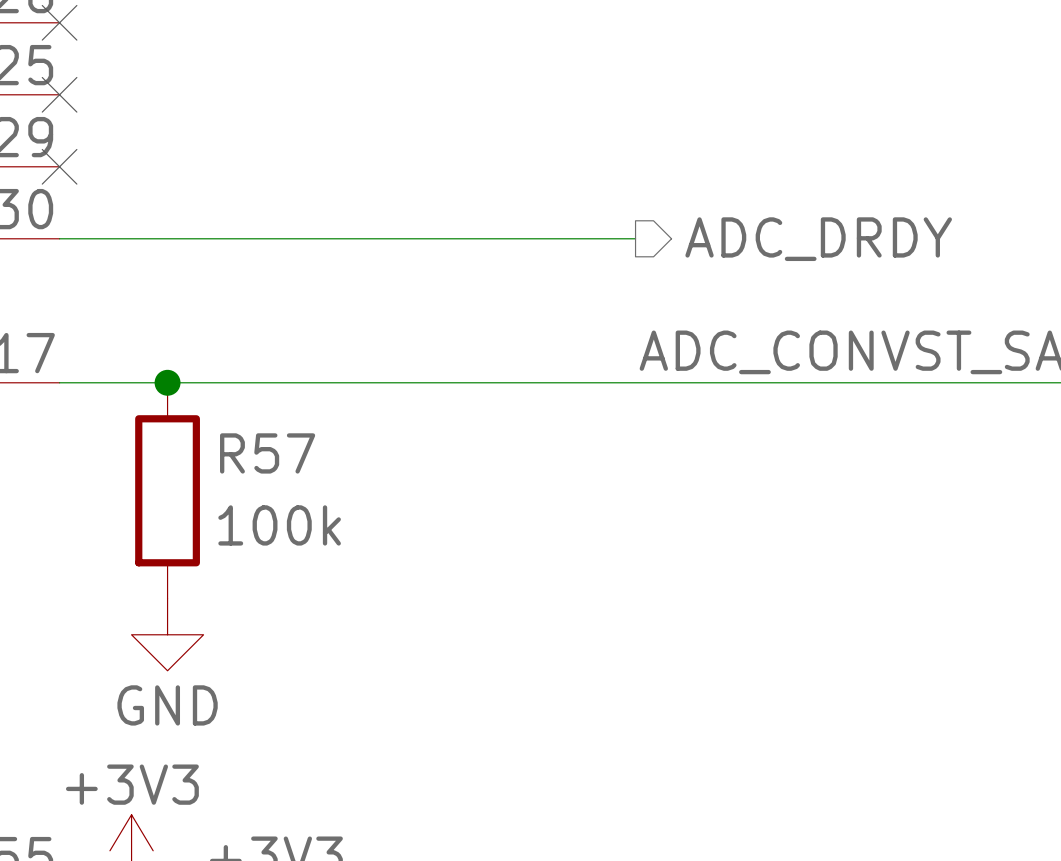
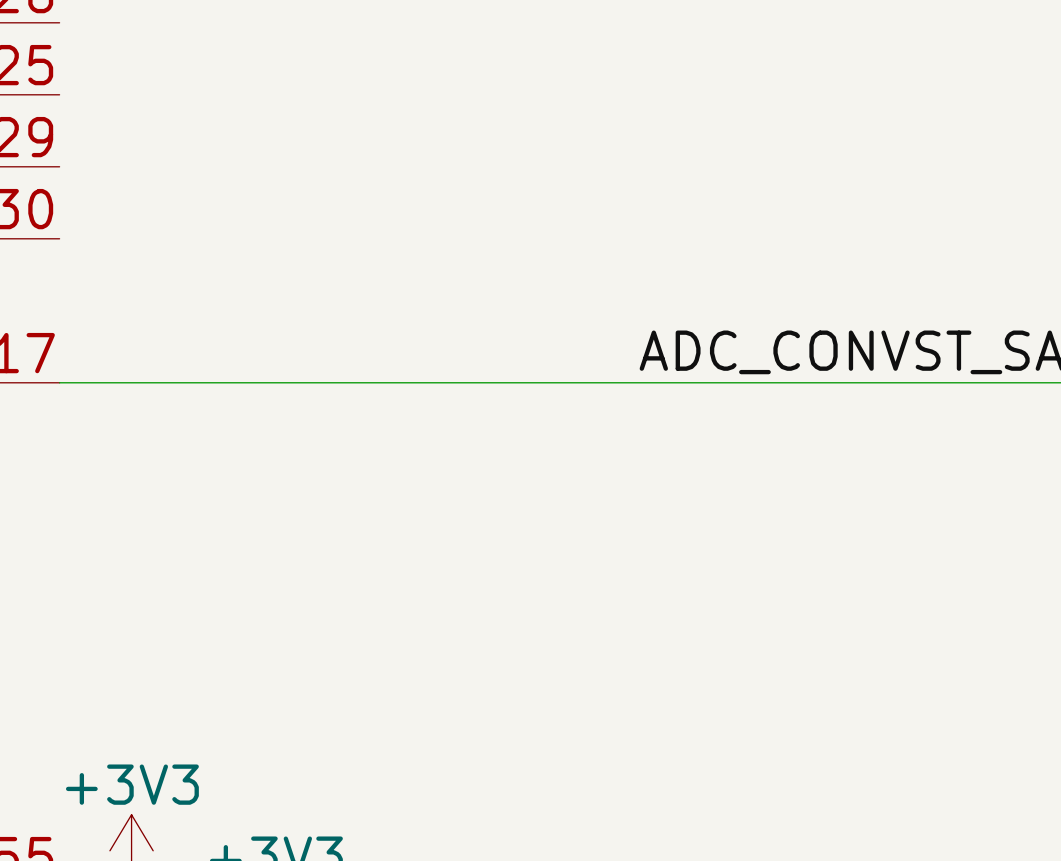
no-connect mark: (59, 22) -> none
no-connect mark: (59, 94) -> none
no-connect mark: (59, 166) -> none
wire: (59, 238) (635, 238) -> none
hierarchical label: ADC_DRDY (818, 239) -> none
junction: (167, 382) -> none
R57: 100k (167, 490) -> none
power symbol: GND (167, 634) -> none

